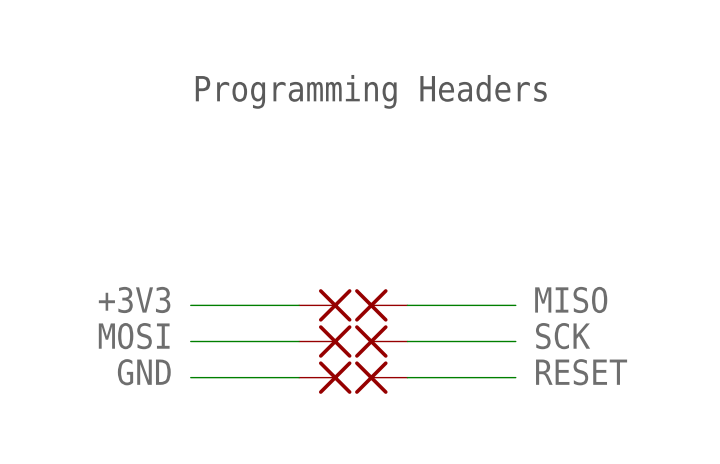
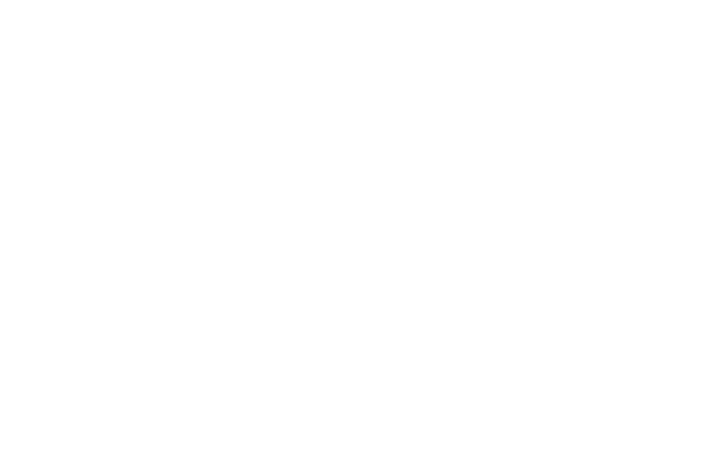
text: Programming Headers (371, 91) -> none
label: +3V3 (134, 299) -> none
label: MISO (571, 299) -> none
wire: (190, 305) (299, 305) -> none
part: (325, 305) -> none
part: (381, 305) -> none
wire: (407, 305) (515, 305) -> none
label: MOSI (134, 336) -> none
label: SCK (563, 336) -> none
wire: (190, 341) (299, 341) -> none
part: (325, 341) -> none
part: (381, 341) -> none
wire: (407, 341) (515, 341) -> none
label: GND (144, 372) -> none
label: RESET (581, 372) -> none
wire: (190, 377) (299, 377) -> none
part: (325, 377) -> none
part: (381, 377) -> none
wire: (407, 377) (515, 377) -> none

